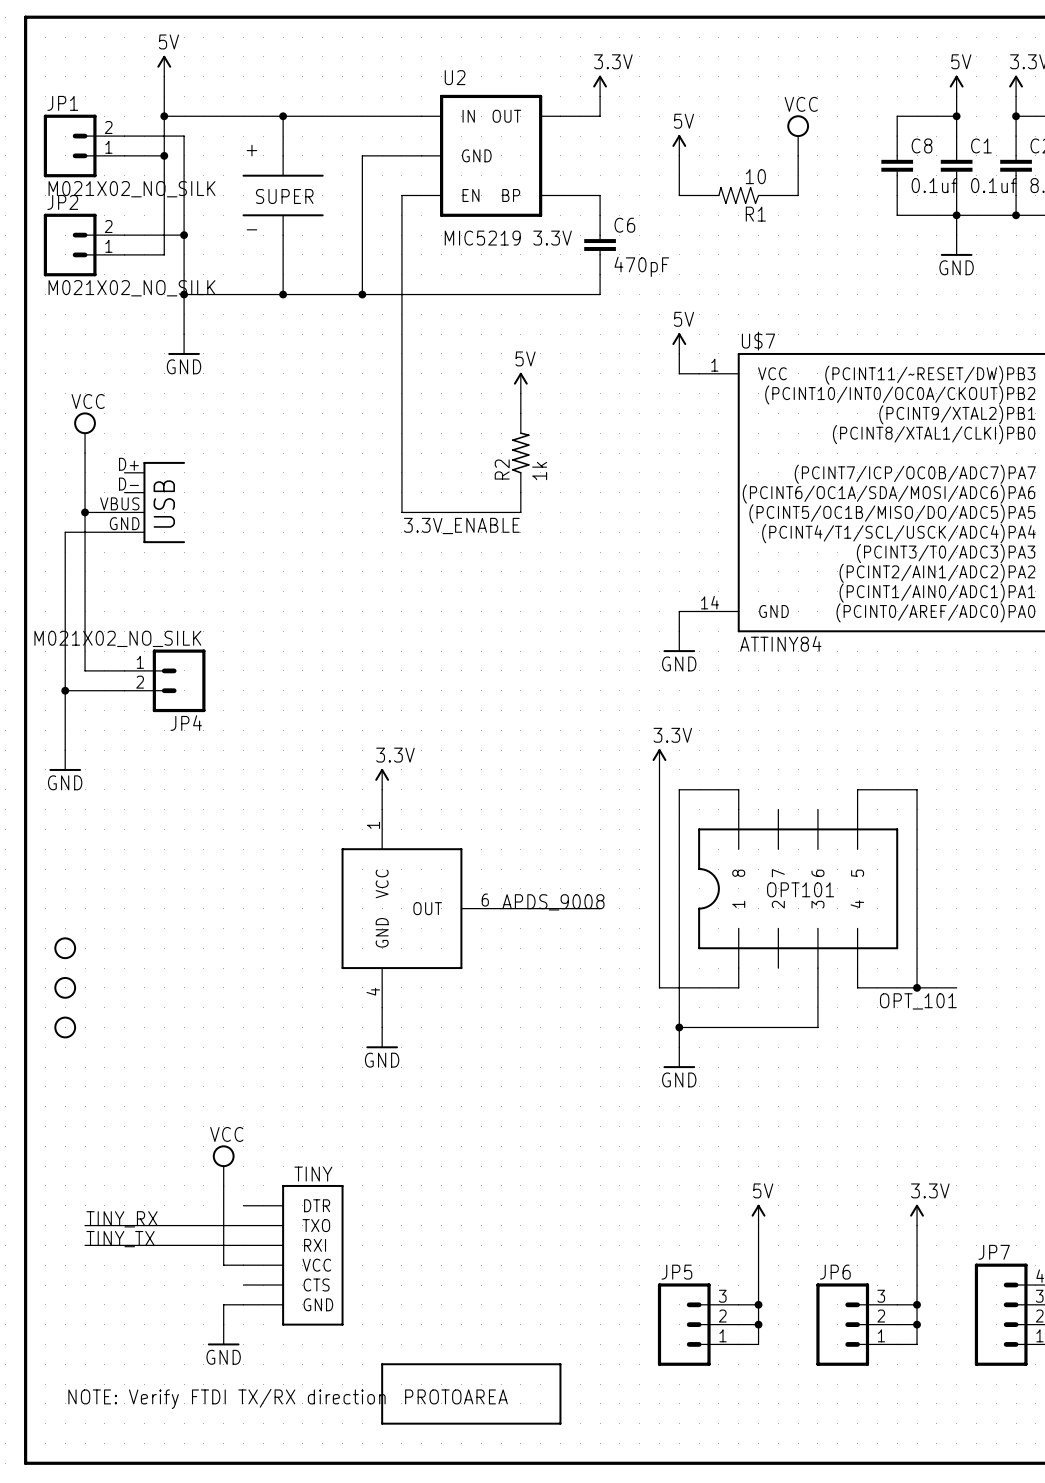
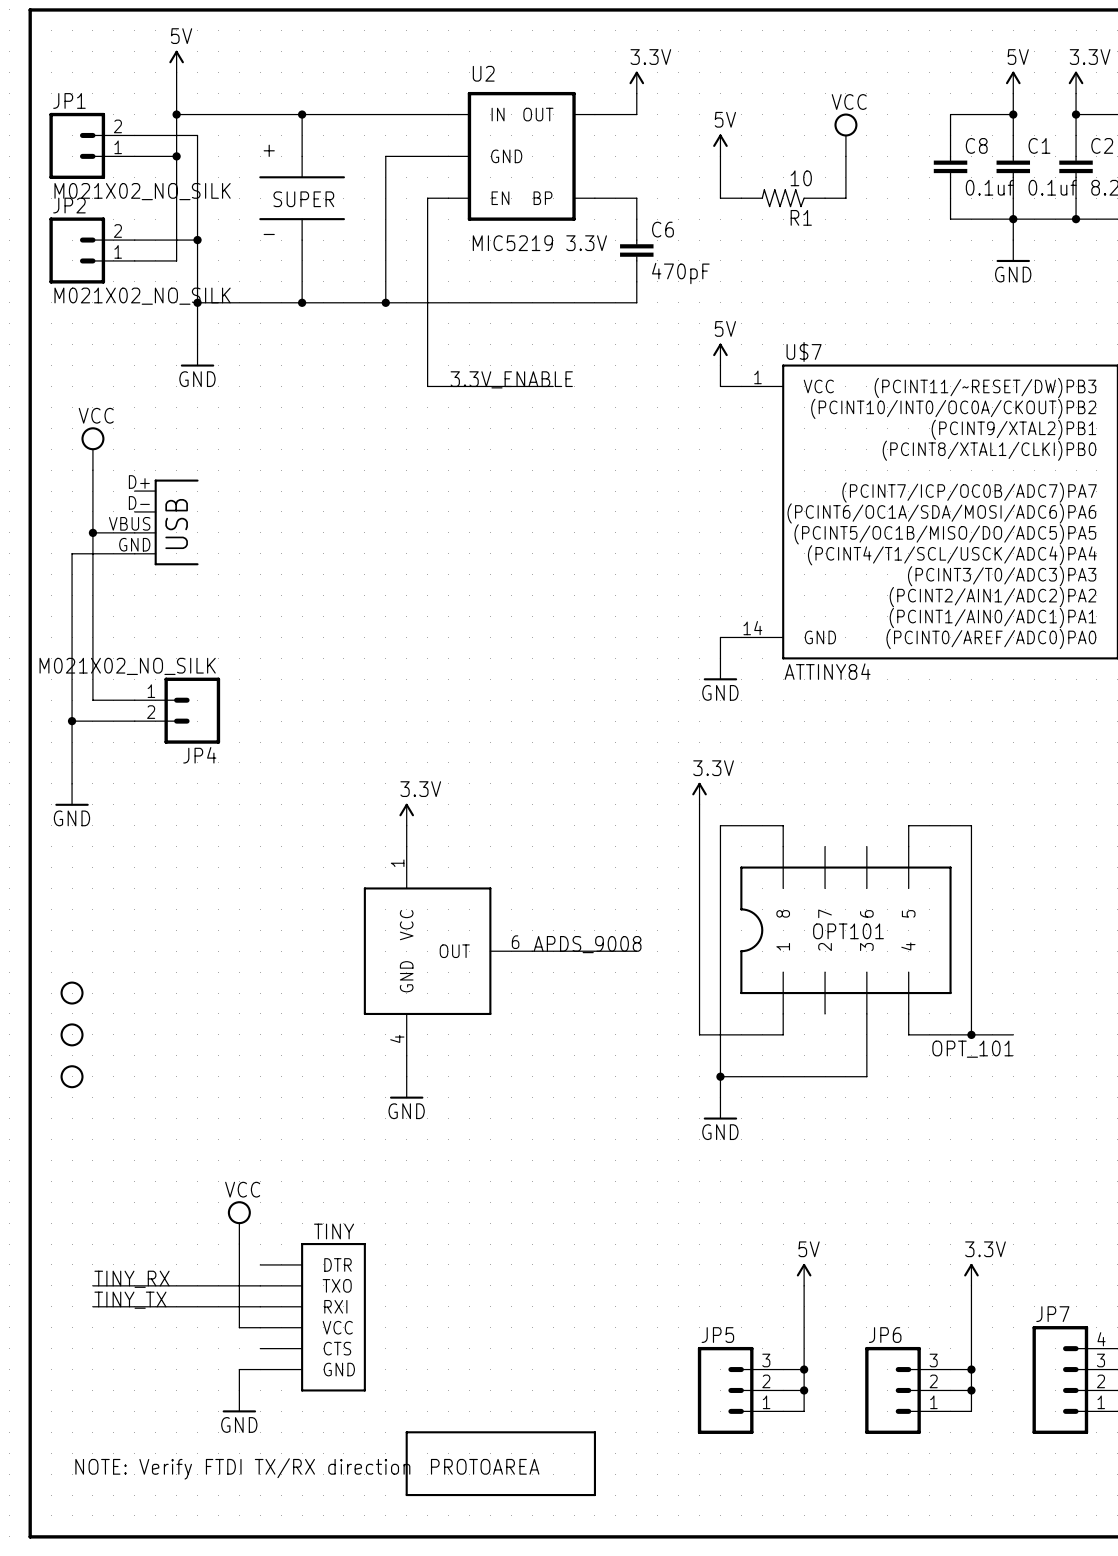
wire: (401, 373) (401, 512) (520, 512) (520, 492) -> (427, 386) (553, 386)
power symbol: 5V (520, 383) -> none
wire: (520, 393) (520, 413) -> none
R2: 1k (520, 453) -> none
label position: 3.3V_ENABLE (461, 525) -> 3.3V_ENABLE (511, 379)

